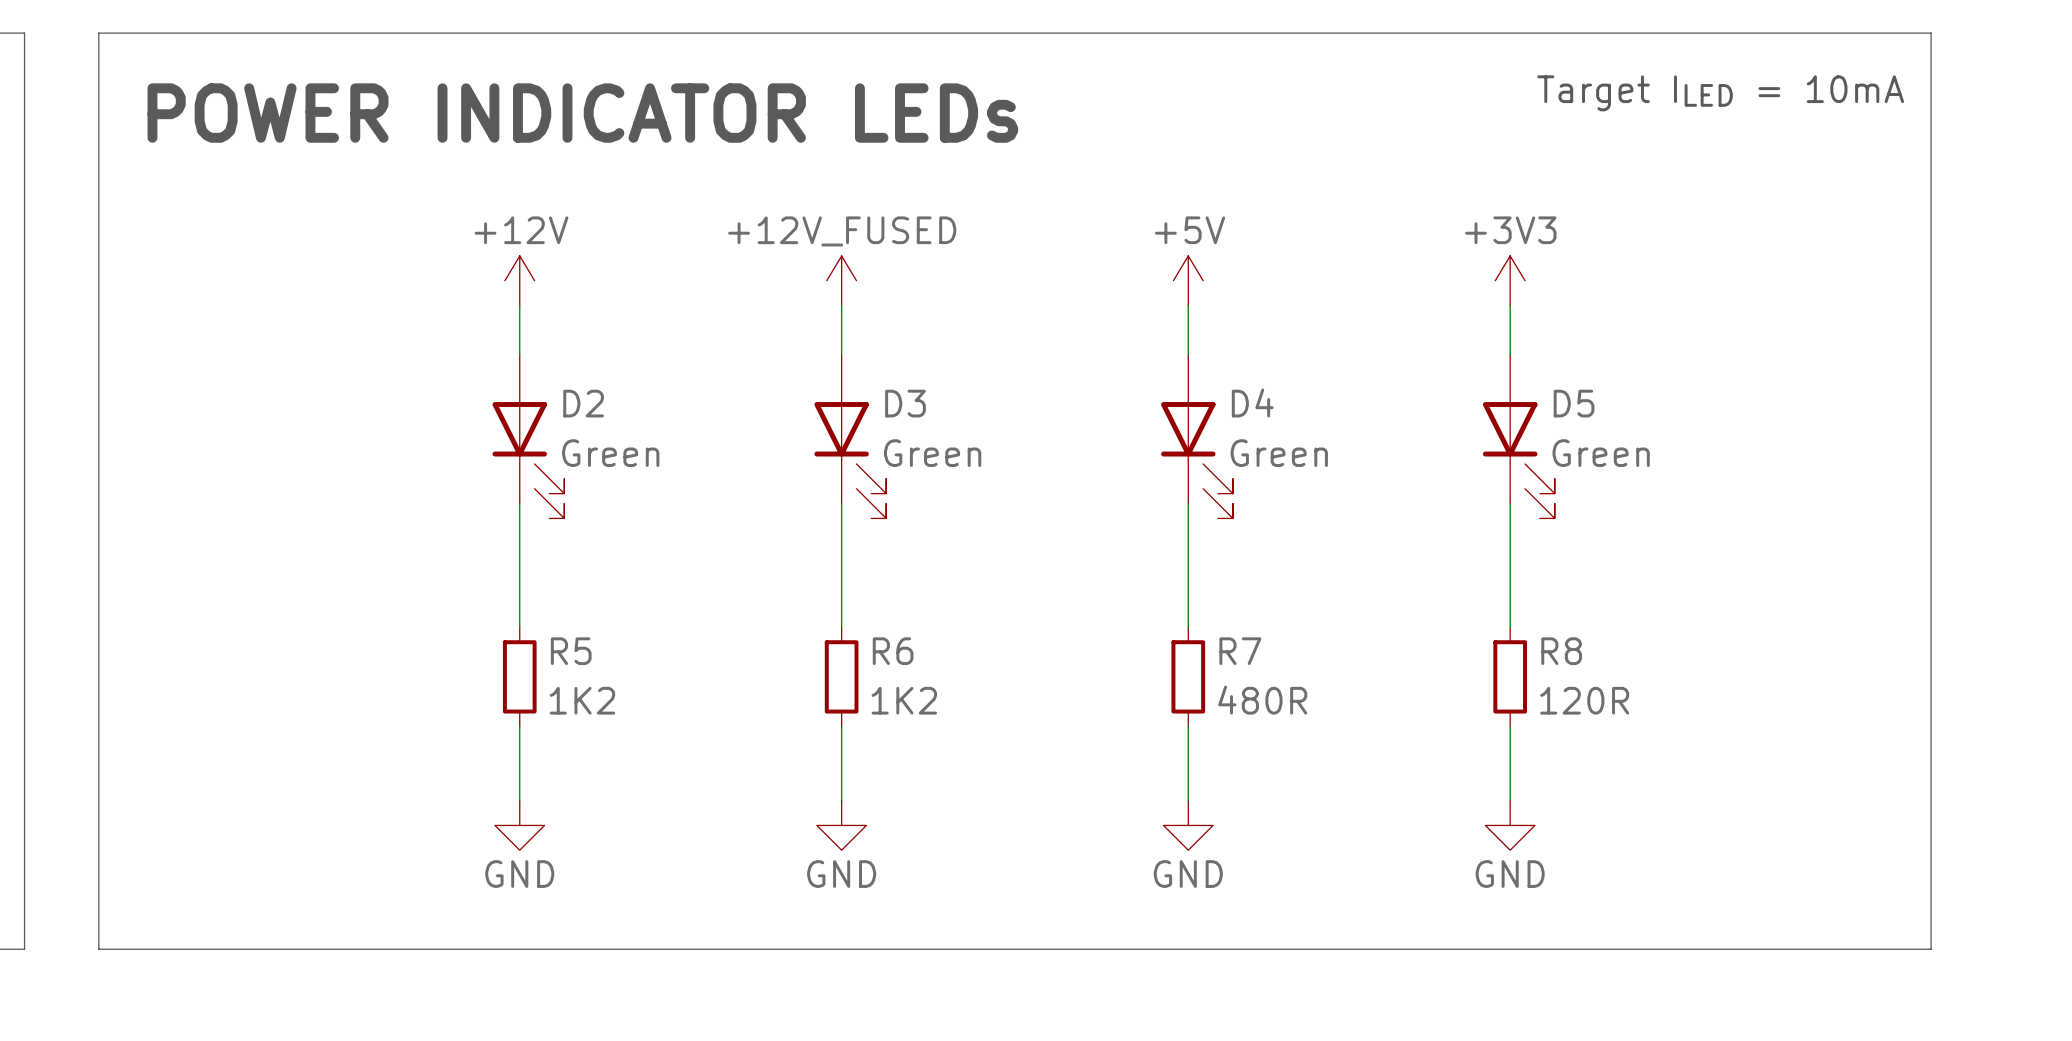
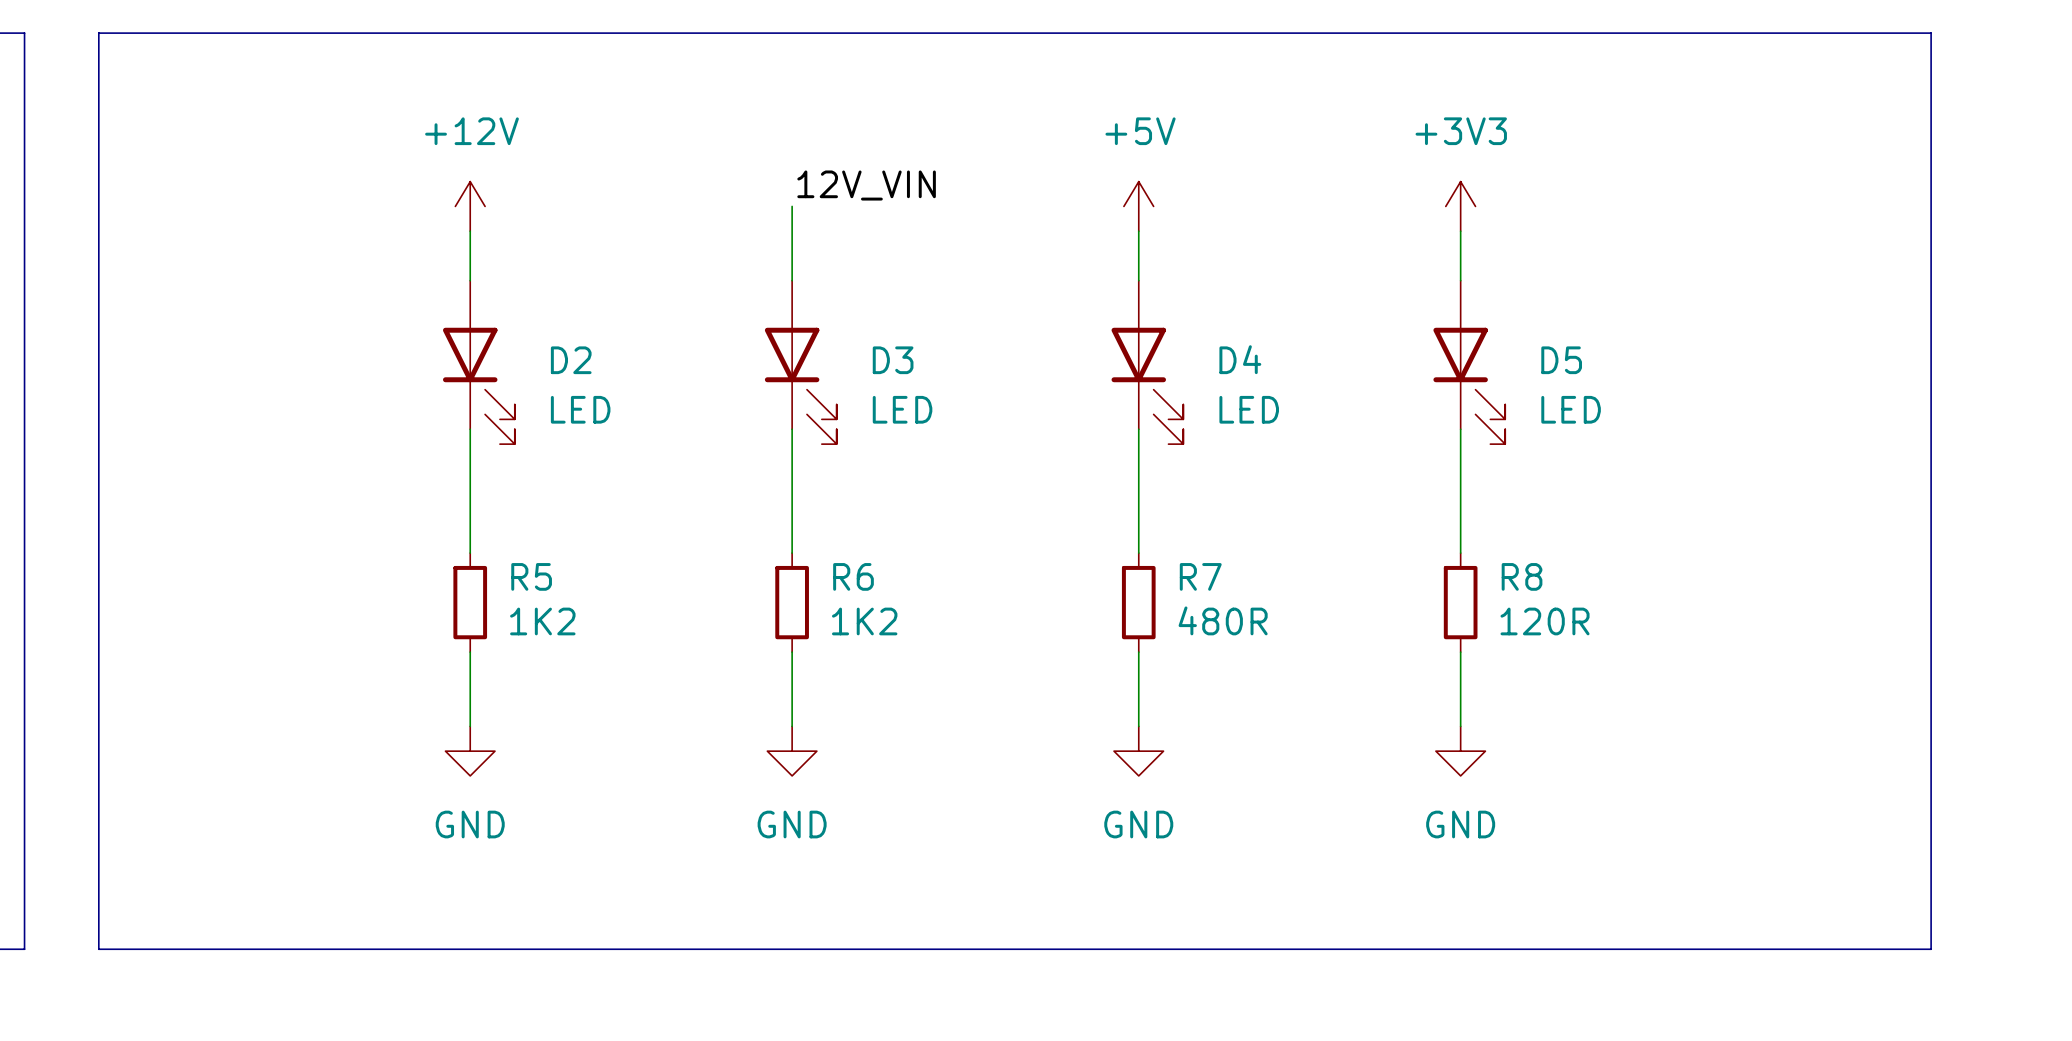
text: Target ILED = 10mA (1720, 93) -> none
text: POWER INDICATOR LEDs (582, 113) -> none
label: none -> 12V_VIN (866, 185)
wire: none -> (792, 206) (792, 280)
power symbol text position: +12V (521, 230) -> +12V (472, 131)
power symbol text position: +5V (1190, 230) -> +5V (1140, 131)
power symbol text position: +3V3 (1510, 230) -> +3V3 (1461, 131)
power symbol position: +12V (519, 280) -> +12V (470, 206)
power symbol: +12V_FUSED (841, 280) -> none
power symbol position: +5V (1188, 280) -> +5V (1138, 206)
power symbol position: +3V3 (1510, 280) -> +3V3 (1460, 206)
wire: (519, 305) (519, 354) -> (470, 231) (470, 280)
wire: (841, 305) (841, 354) -> none
wire: (1188, 305) (1188, 354) -> (1138, 231) (1138, 280)
wire: (1510, 305) (1510, 354) -> (1460, 231) (1460, 280)
D2 name position: D2 (583, 403) -> D2 (571, 360)
D3 name position: D3 (905, 403) -> D3 (893, 360)
D4 name position: D4 (1252, 403) -> D4 (1240, 359)
D5 name position: D5 (1574, 403) -> D5 (1561, 360)
D2 position: (528, 436) -> (478, 362)
D3 position: (850, 436) -> (800, 362)
D4 position: (1196, 436) -> (1147, 362)
D5 position: (1518, 436) -> (1469, 362)
D2 value: Green (610, 453) -> LED (580, 409)
D3 value: Green (932, 453) -> LED (902, 409)
D4 value: Green (1279, 453) -> LED (1249, 409)
D5 value: Green (1601, 453) -> LED (1571, 409)
wire: (519, 503) (519, 627) -> (470, 429) (470, 553)
wire: (841, 503) (841, 627) -> (792, 429) (792, 553)
wire: (1188, 503) (1188, 627) -> (1138, 429) (1138, 553)
wire: (1510, 503) (1510, 627) -> (1460, 429) (1460, 553)
R5 name position: R5 (571, 651) -> R5 (531, 576)
R6 name position: R6 (893, 651) -> R6 (853, 576)
R7 name position: R7 (1240, 651) -> R7 (1200, 576)
R8 name position: R8 (1561, 651) -> R8 (1522, 576)
R5 position: (519, 676) -> (470, 602)
R6 position: (841, 676) -> (792, 602)
R7 position: (1188, 676) -> (1138, 602)
R8 position: (1510, 676) -> (1460, 602)
R5 value position: 1K2 (582, 700) -> 1K2 (542, 621)
R6 value position: 1K2 (904, 700) -> 1K2 (864, 621)
R7 value position: 480R (1262, 700) -> 480R (1223, 620)
R8 value position: 120R (1584, 700) -> 120R (1545, 621)
wire: (519, 726) (519, 800) -> (470, 652) (470, 726)
wire: (841, 726) (841, 800) -> (792, 652) (792, 726)
wire: (1188, 726) (1188, 800) -> (1138, 652) (1138, 726)
wire: (1510, 726) (1510, 800) -> (1460, 652) (1460, 726)
power symbol position: GND (519, 825) -> GND (470, 751)
power symbol position: GND (841, 825) -> GND (792, 751)
power symbol position: GND (1188, 825) -> GND (1138, 751)
power symbol position: GND (1510, 825) -> GND (1460, 751)
power symbol text position: GND (519, 874) -> GND (470, 824)
power symbol text position: GND (841, 874) -> GND (792, 824)
power symbol text position: GND (1188, 874) -> GND (1138, 824)
power symbol text position: GND (1510, 874) -> GND (1460, 824)

